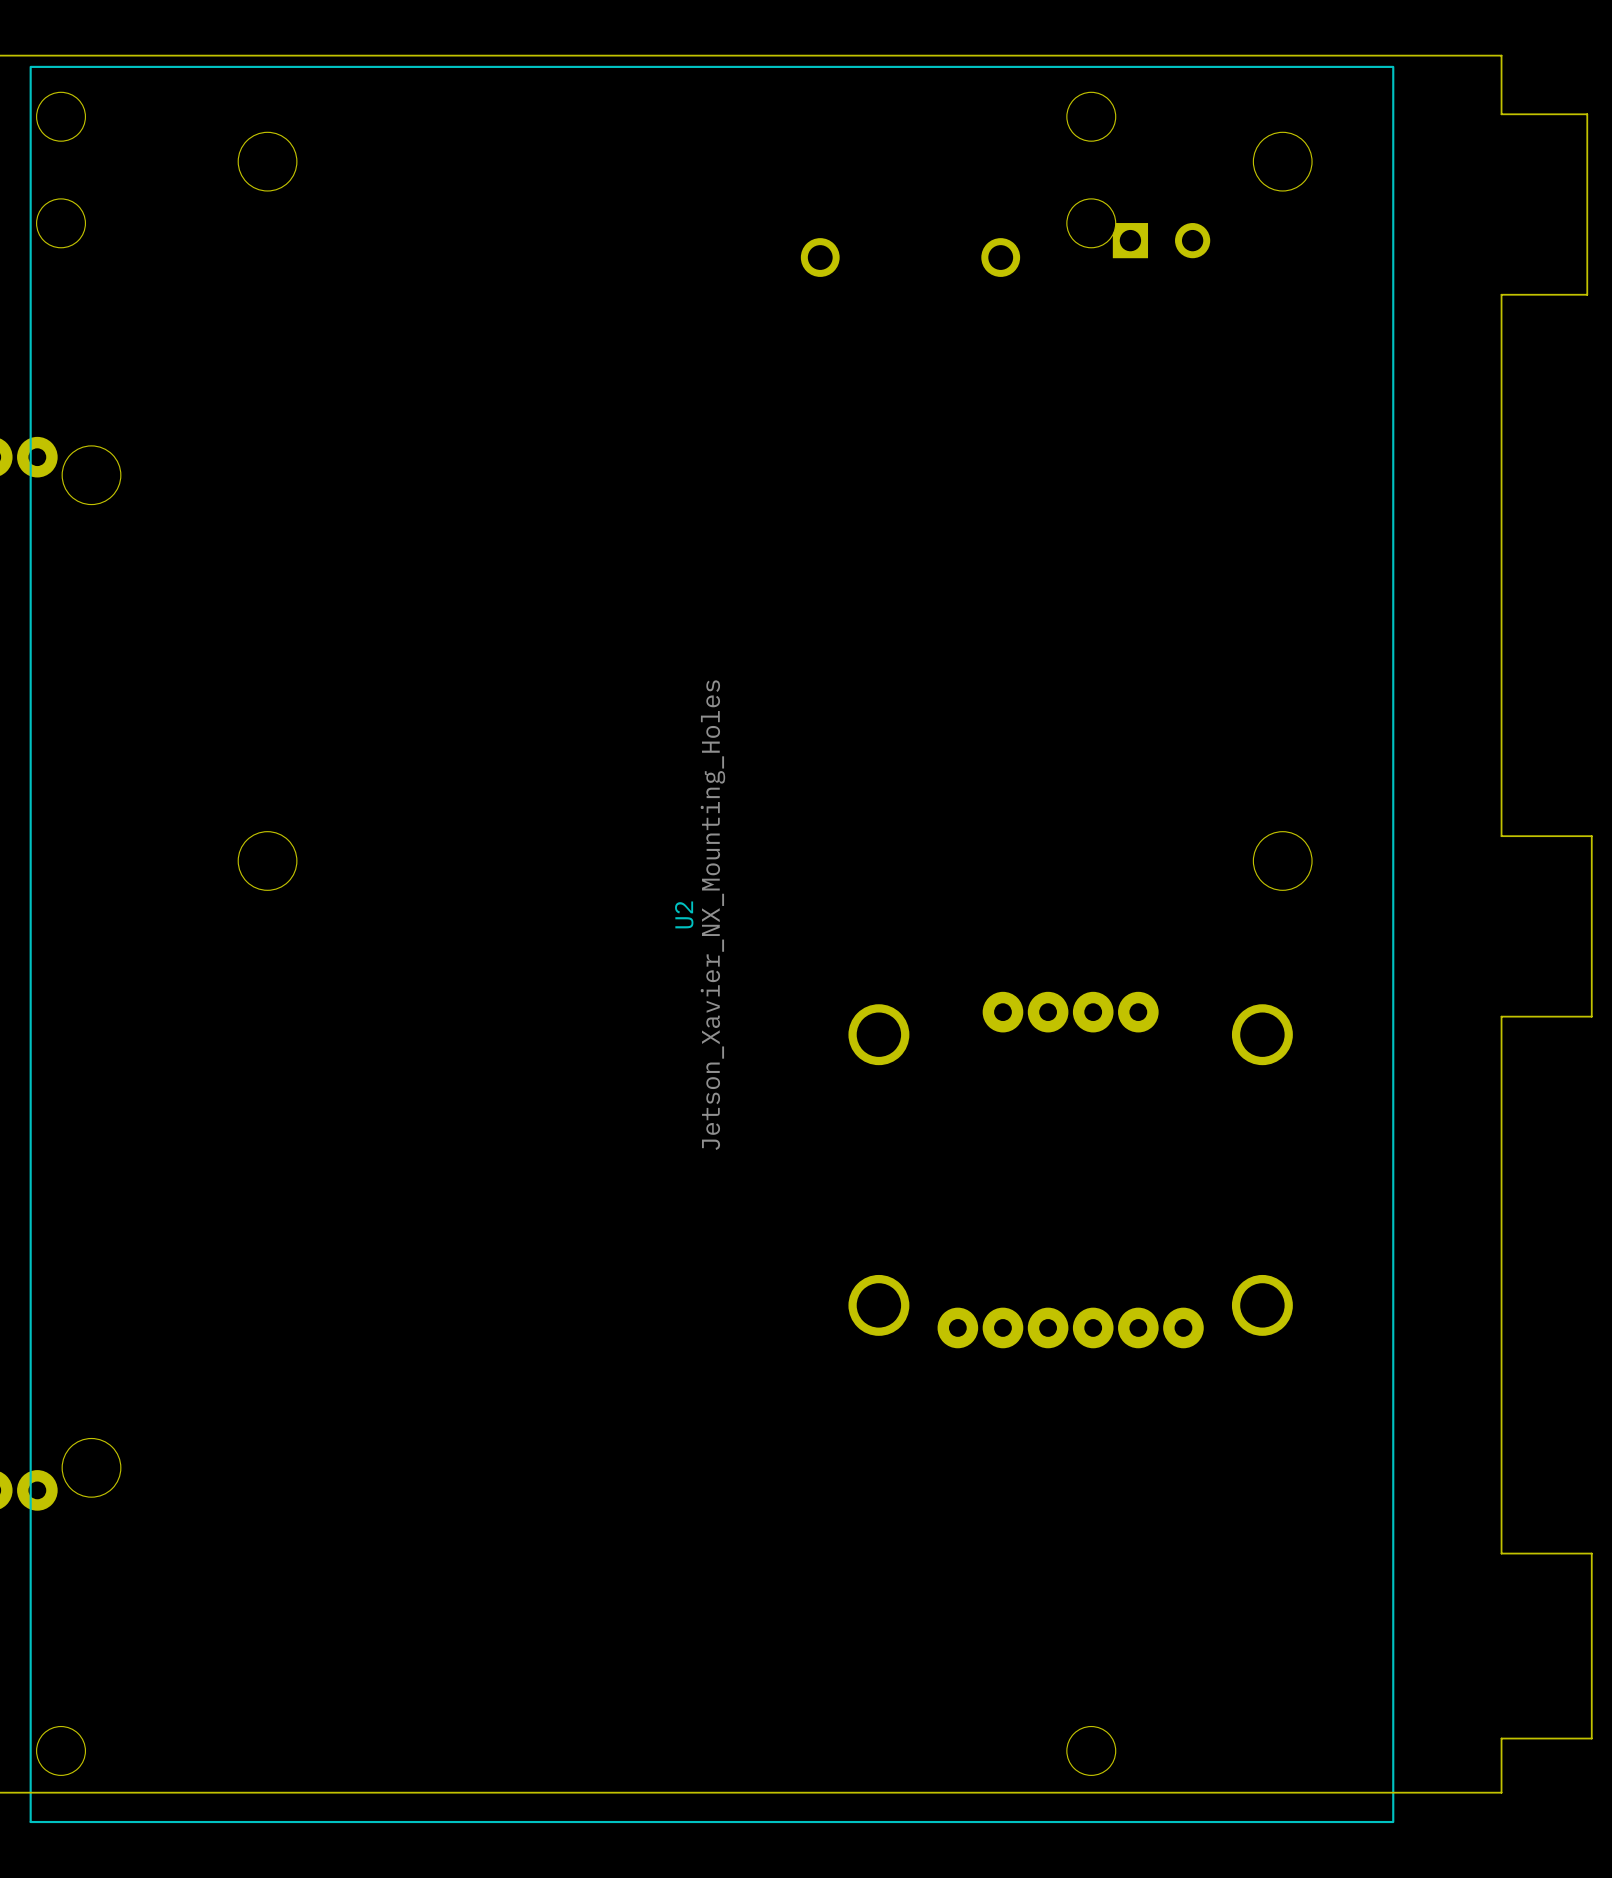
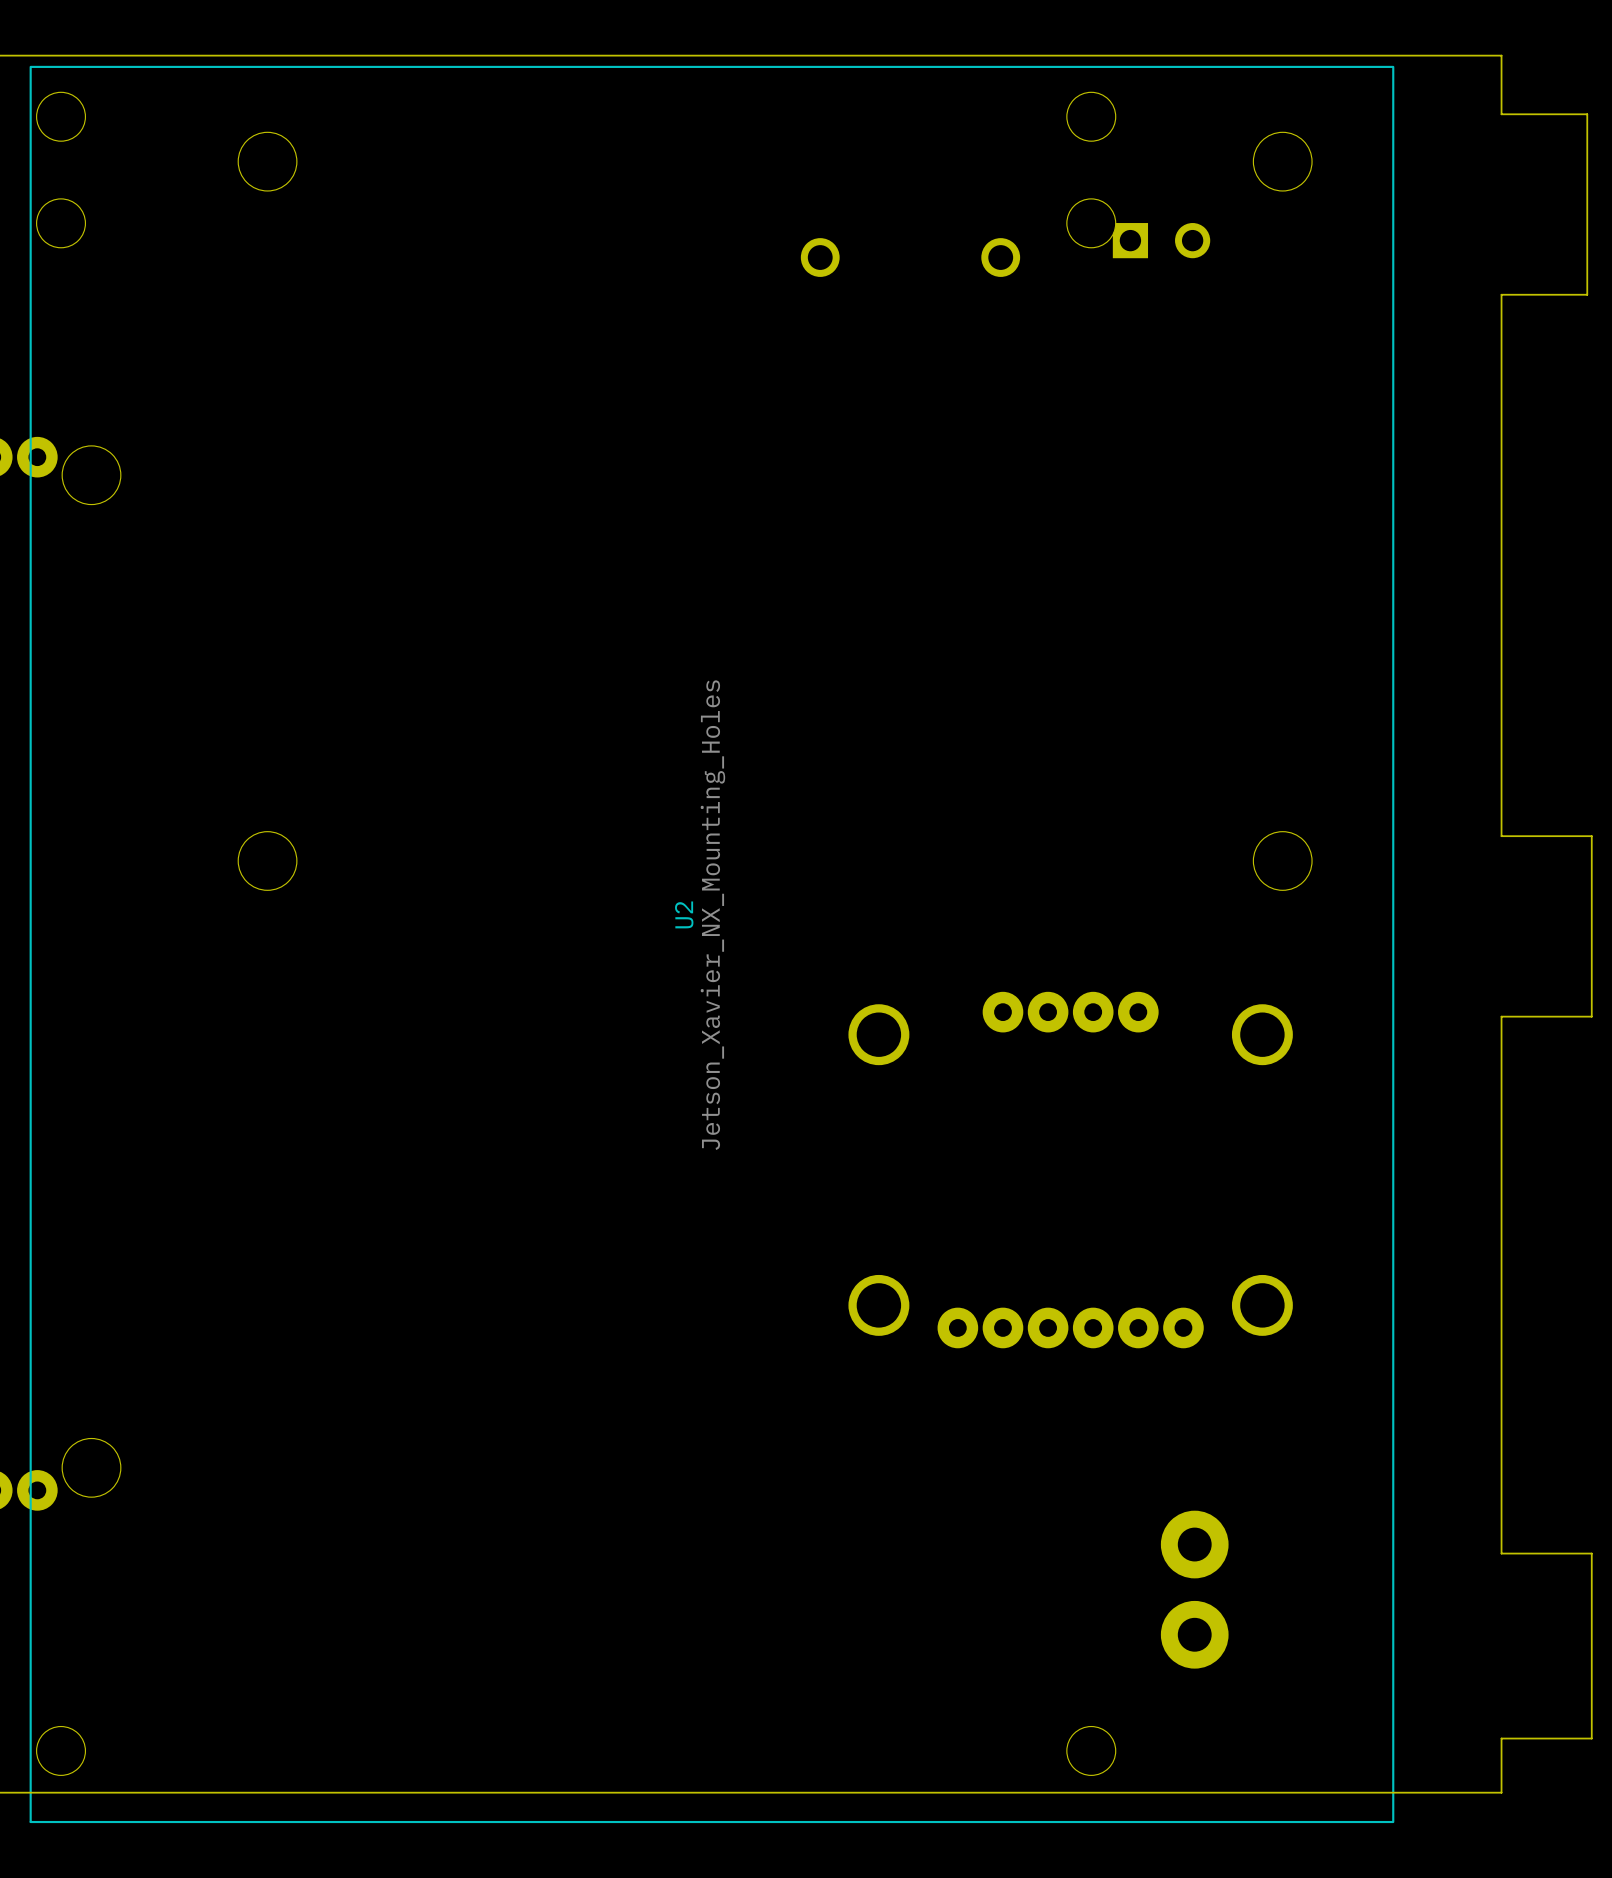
part: none -> (1194, 1589)

